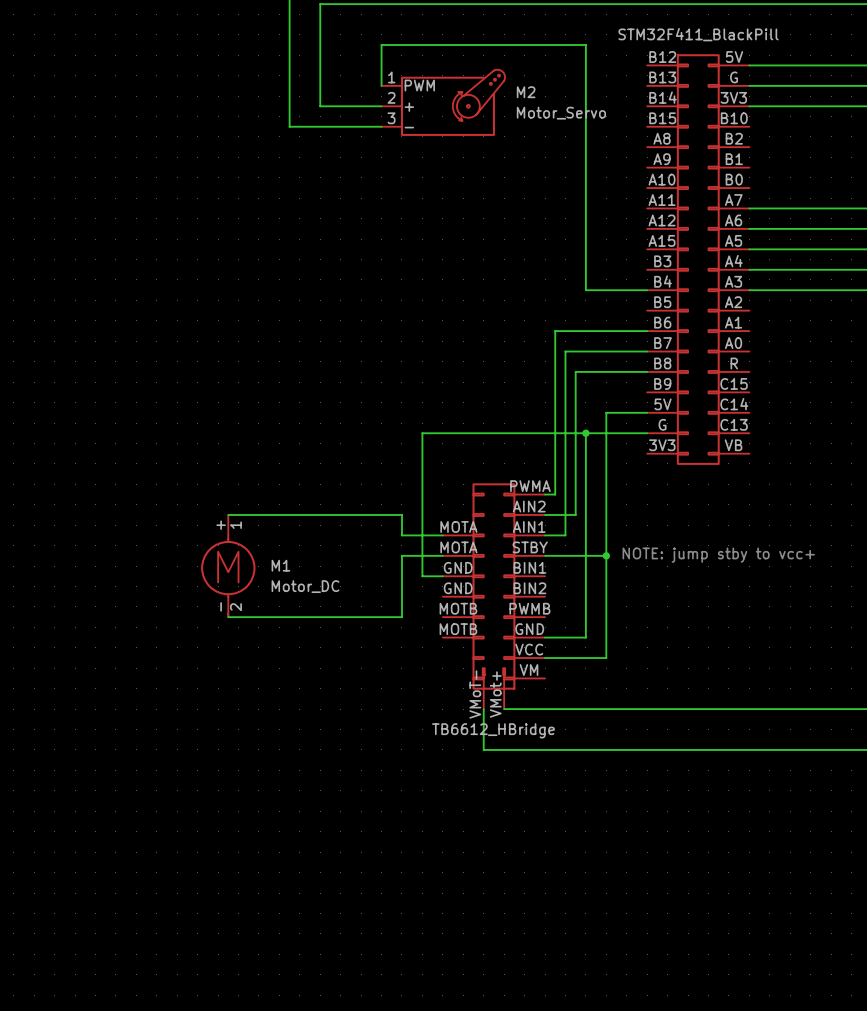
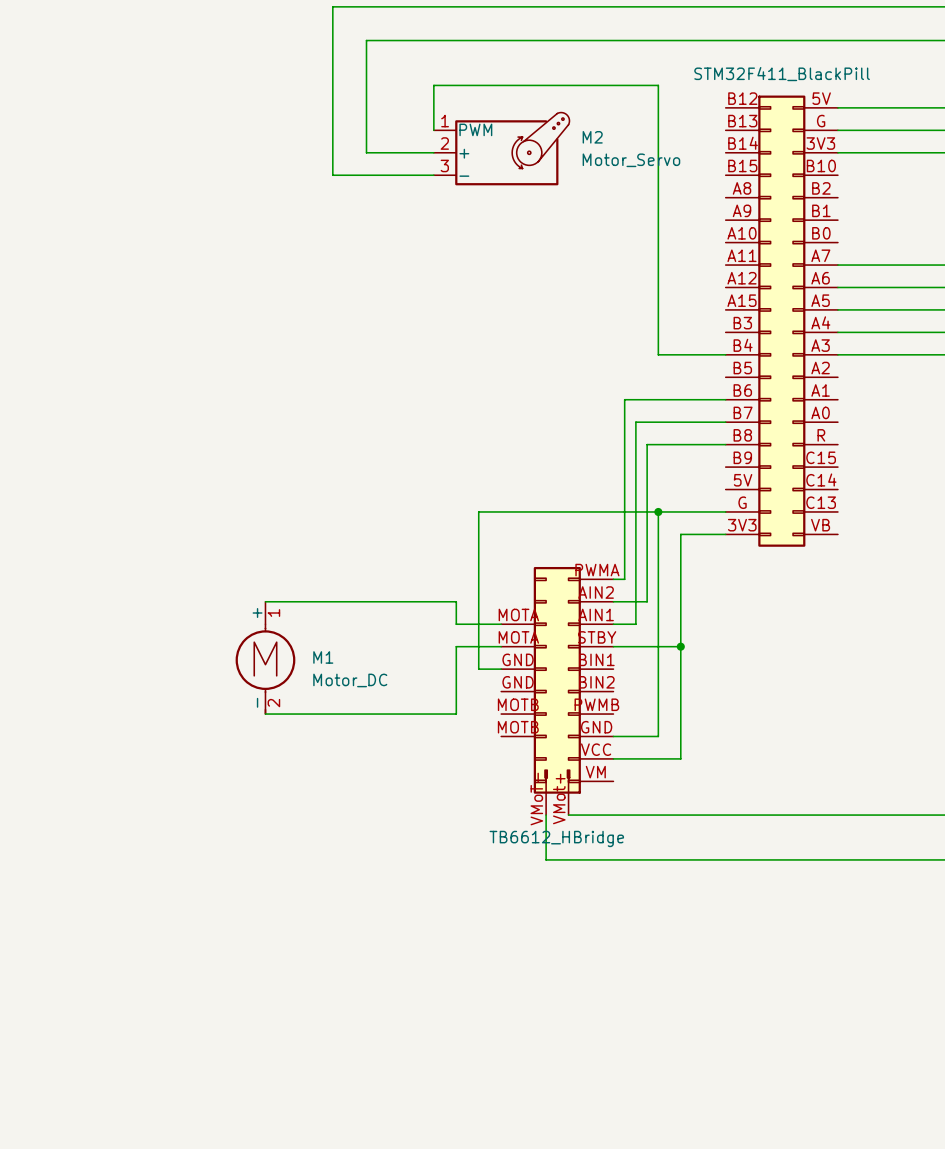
wire: (647, 412) (606, 412) (606, 453) -> (725, 534) (680, 534)
text: NOTE: jump stby to vcc+ (718, 555) -> none

